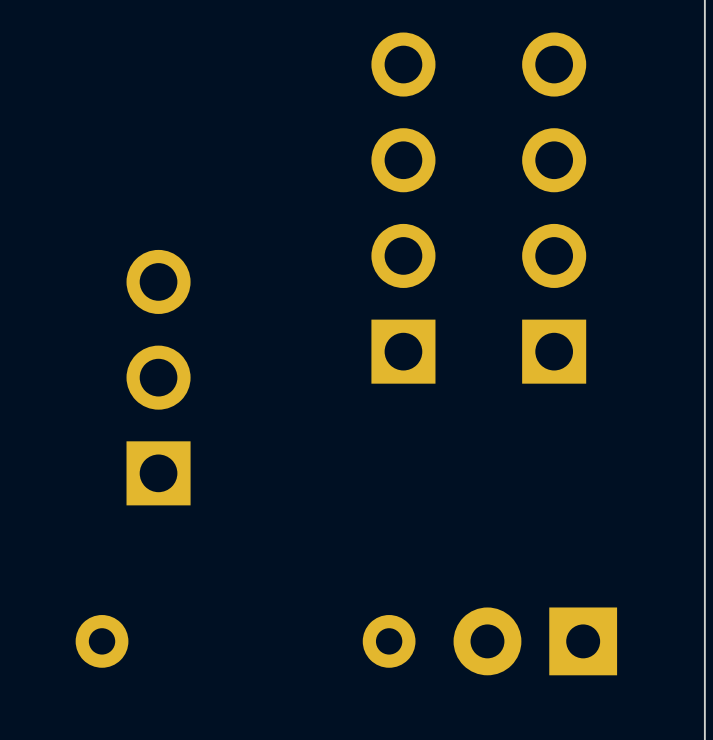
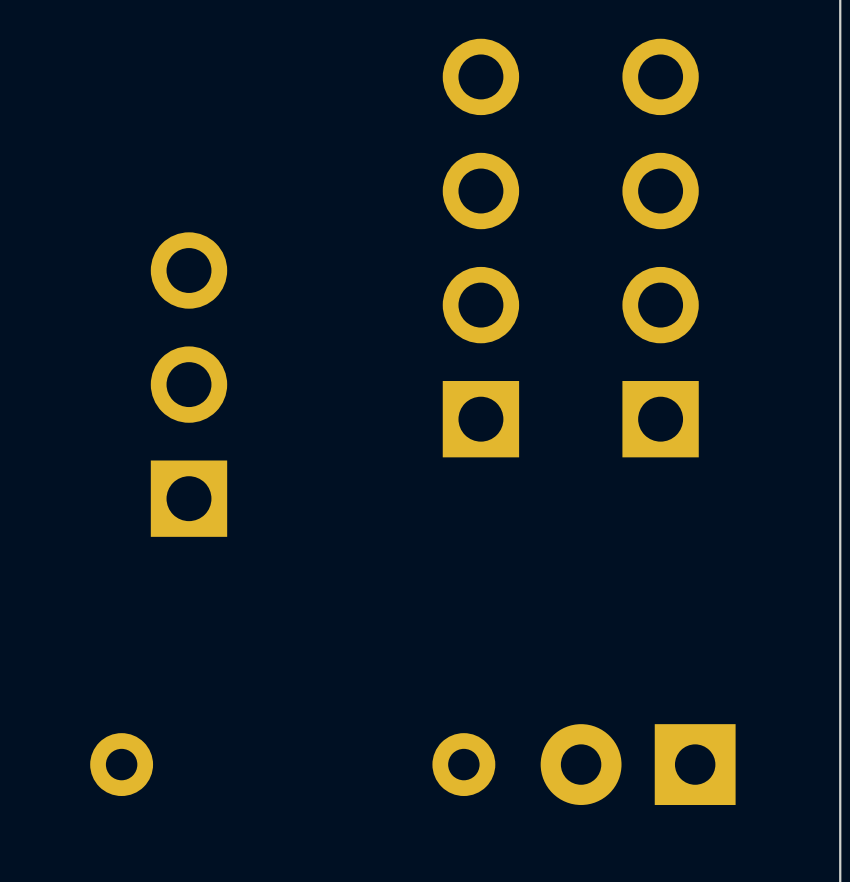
part position: (158, 377) -> (188, 384)

